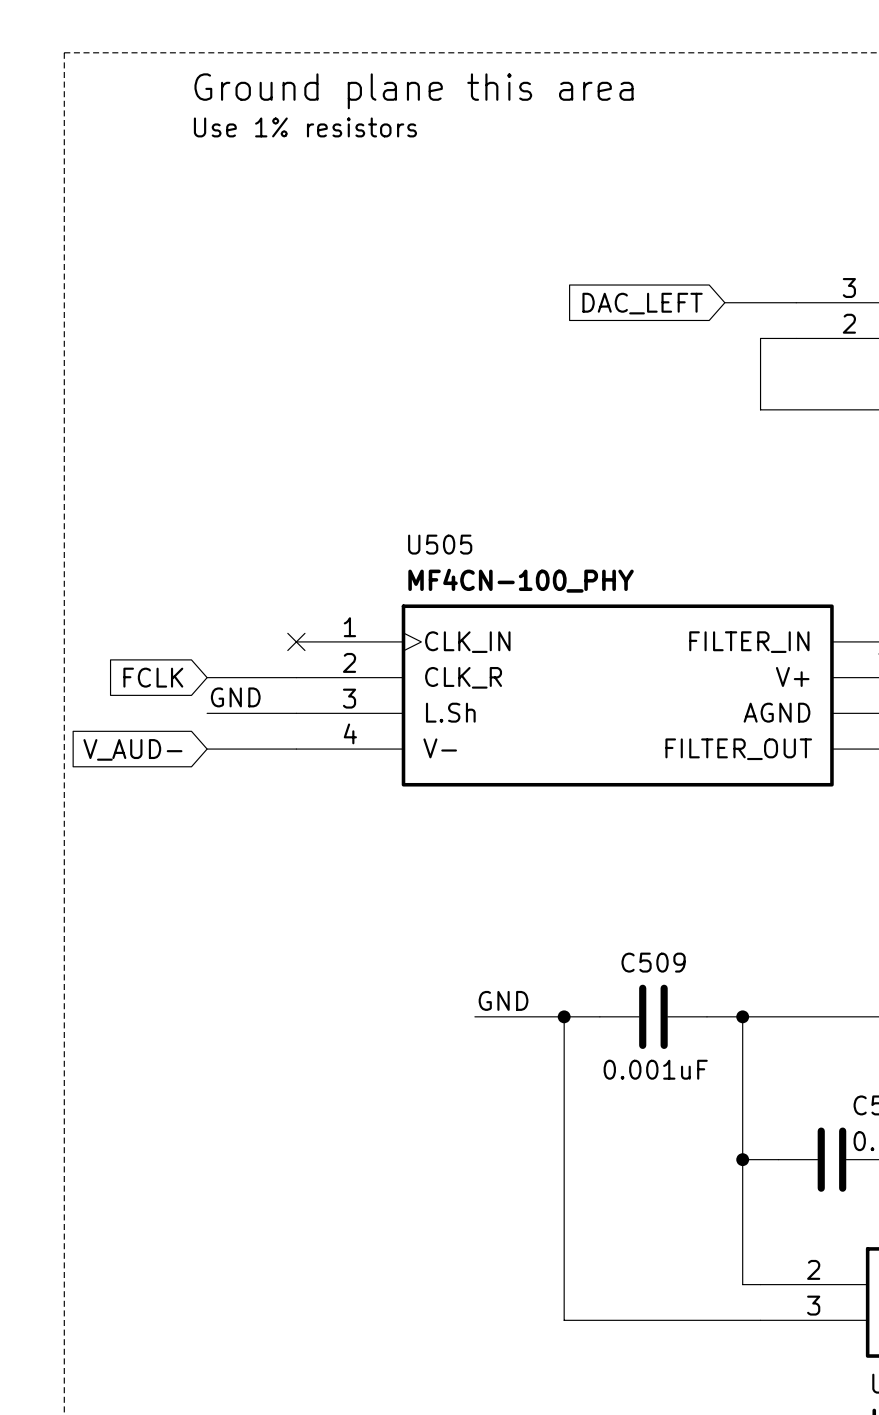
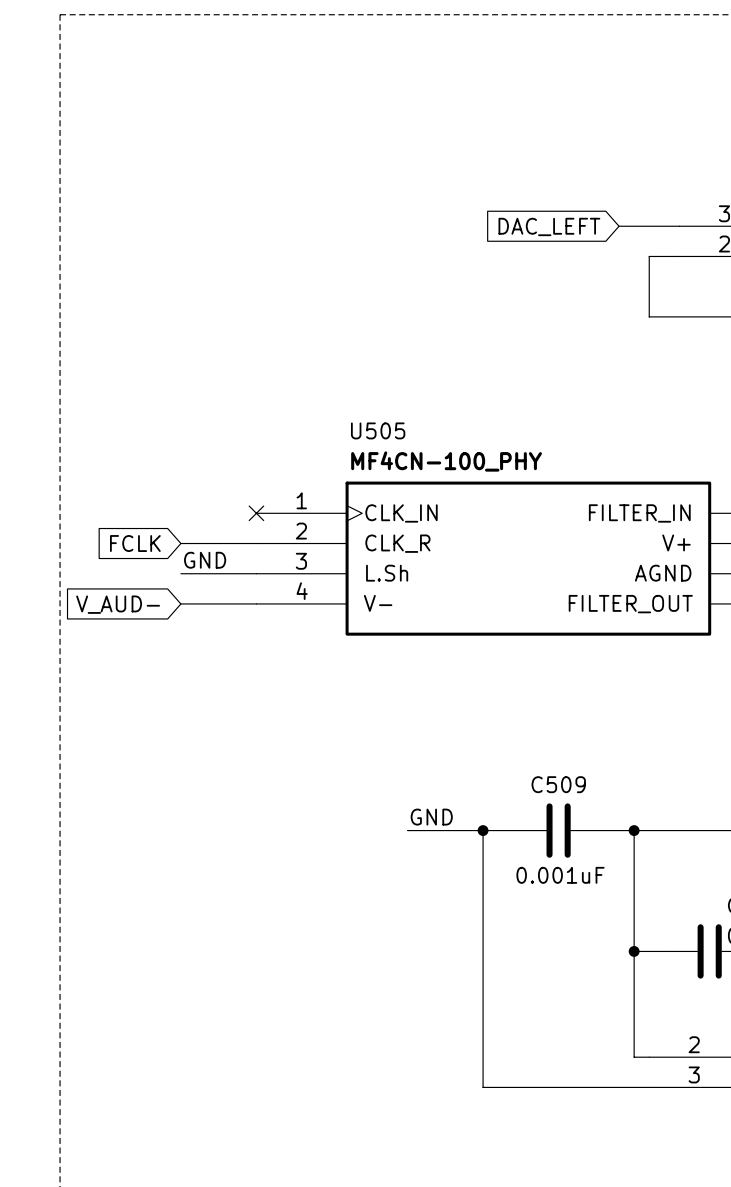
text: Ground plane this area (414, 91) -> none
text: Use 1% resistors (305, 127) -> none

